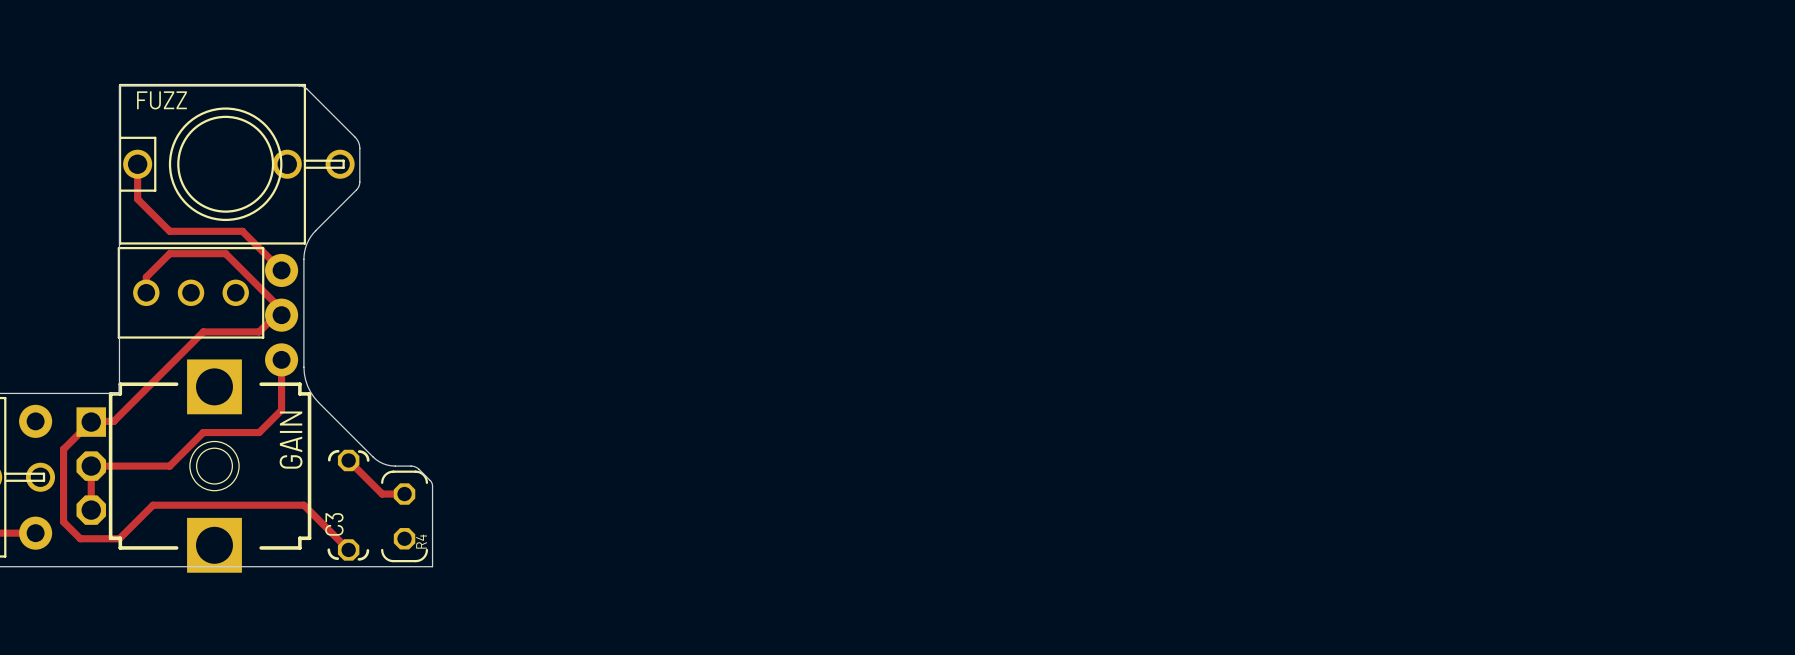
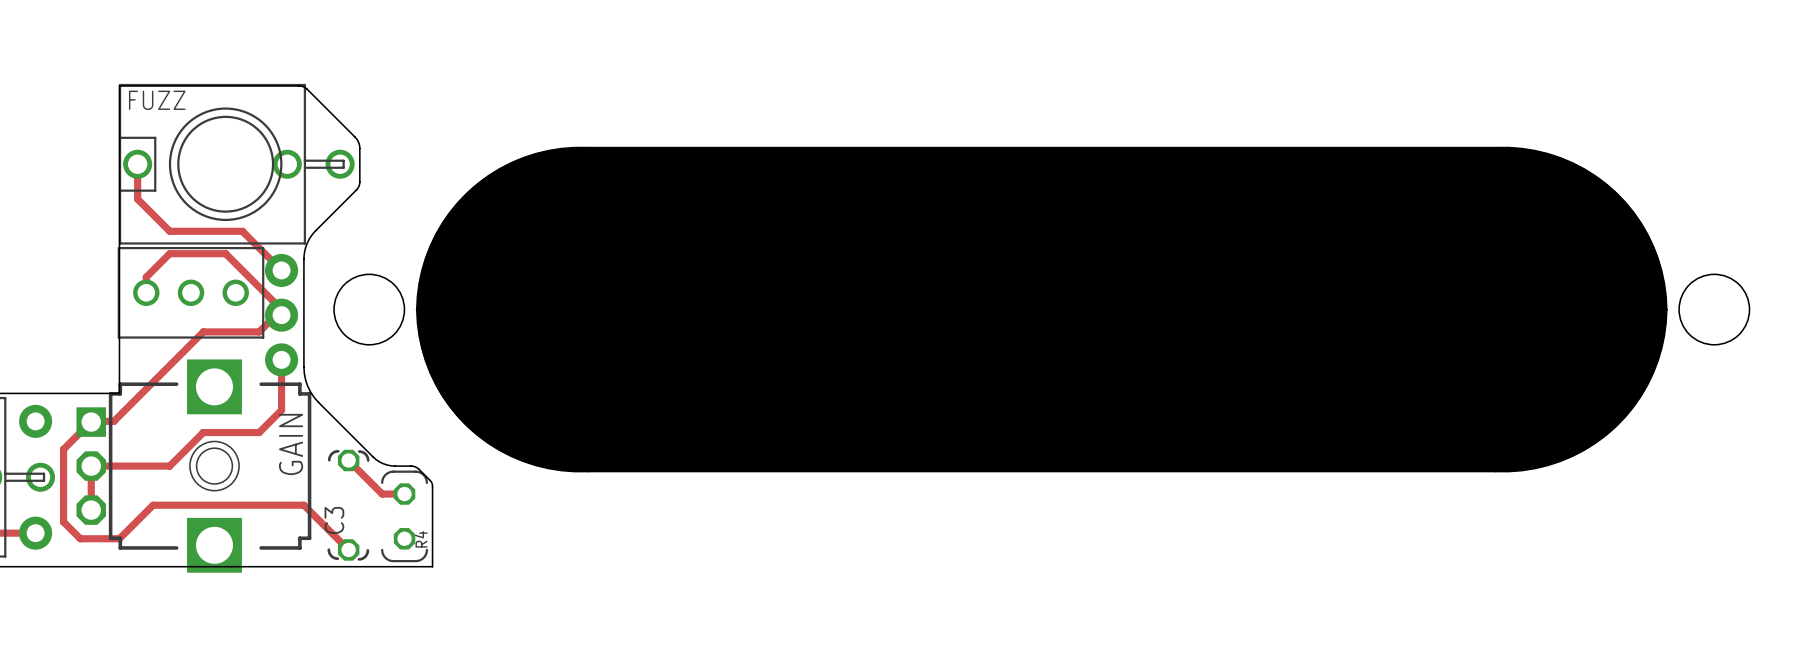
part: none -> (1041, 309)

